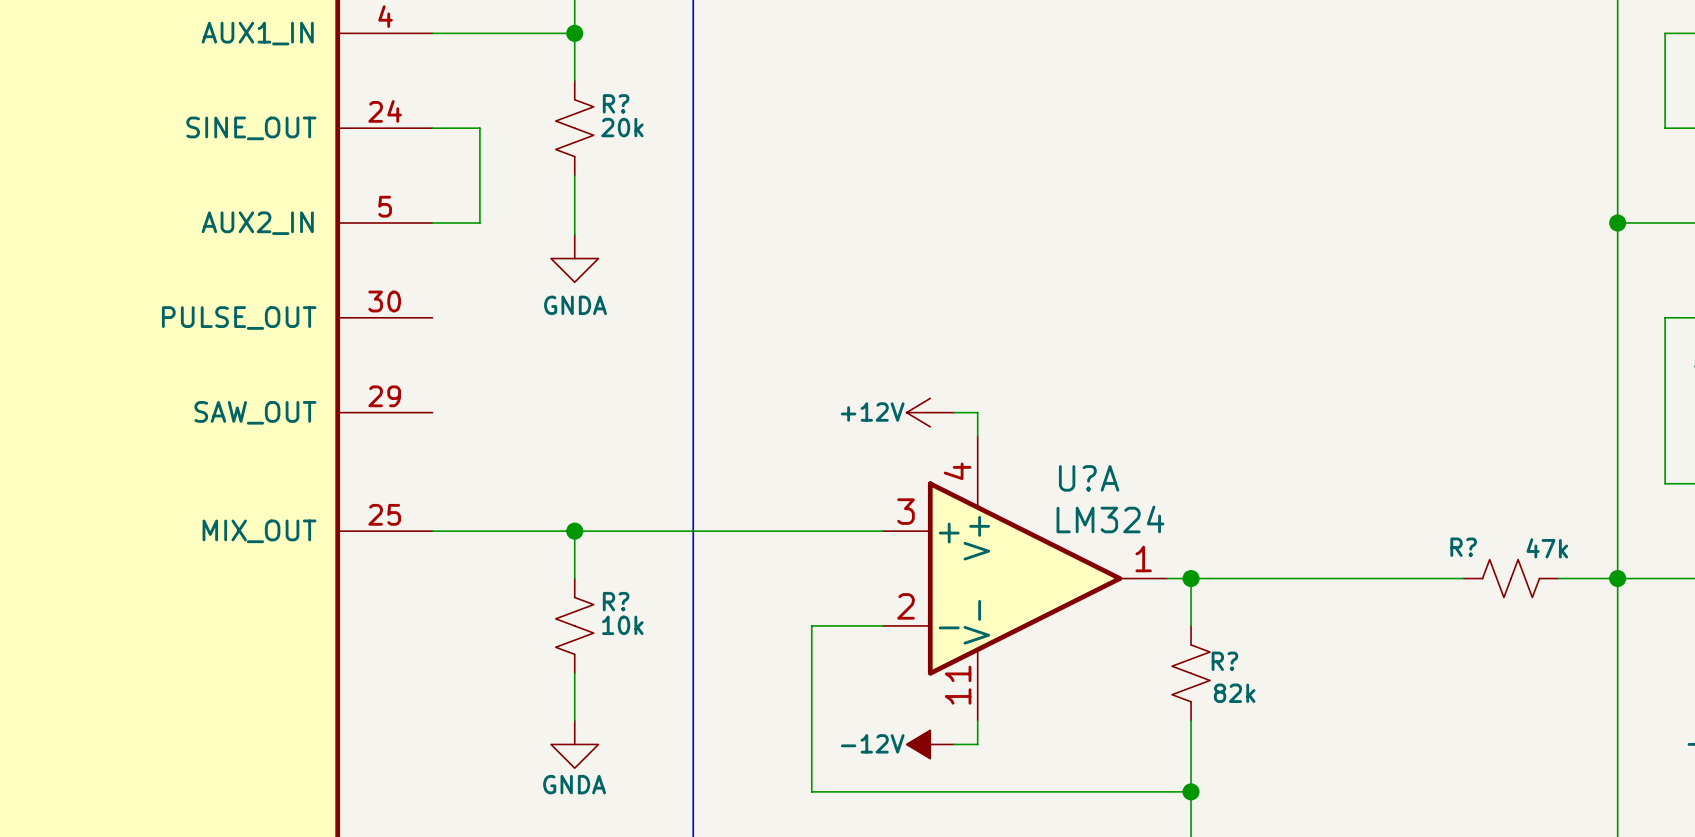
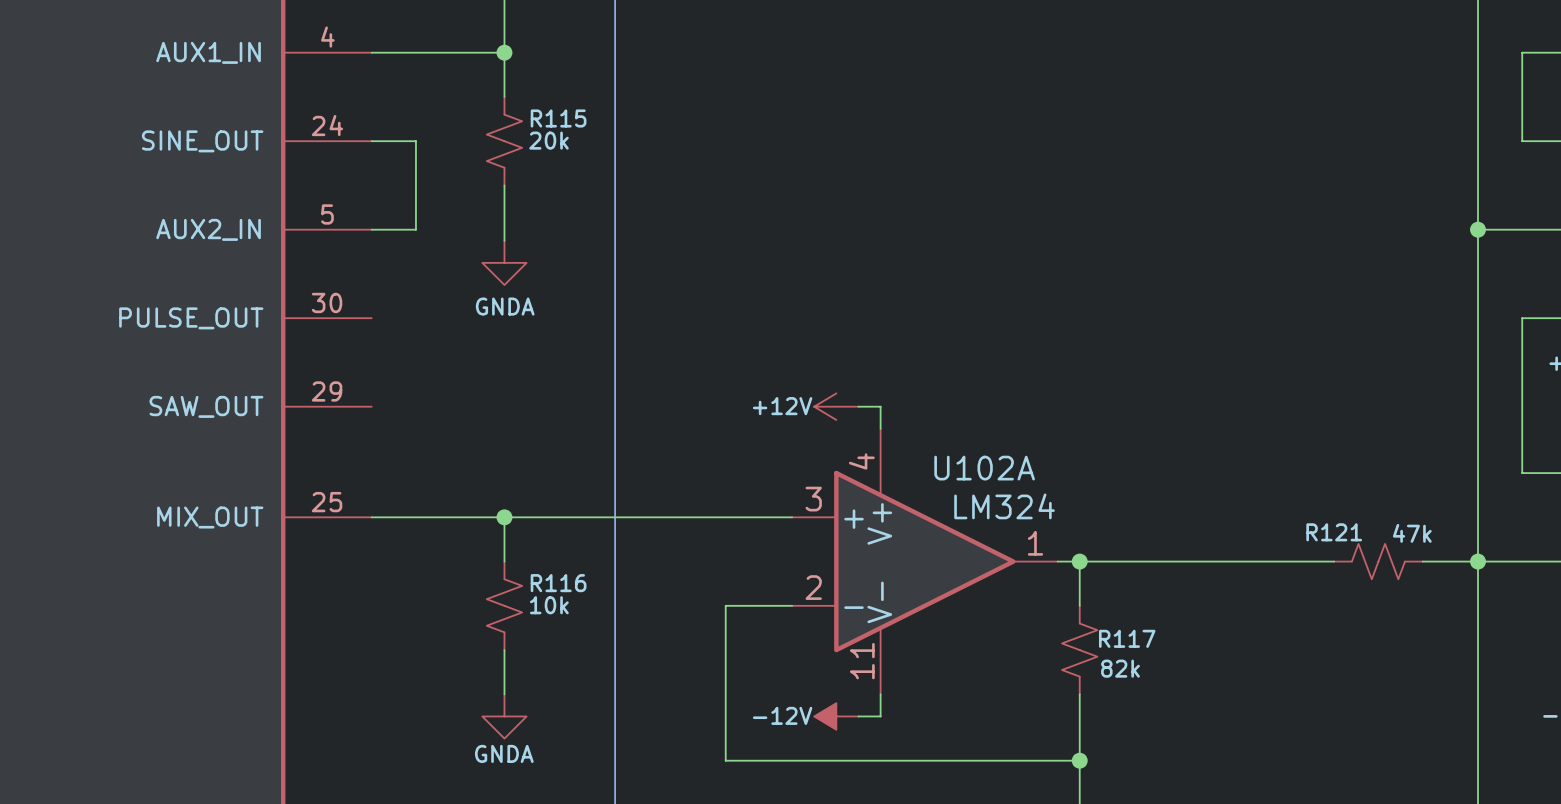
R? name: R? (616, 103) -> R115 (558, 118)
U?A name: U?A (1089, 478) -> U102A (984, 468)
R? name: R? (1463, 547) -> R121 (1334, 532)
R? name: R? (616, 601) -> R116 (558, 583)
R? name: R? (1224, 661) -> R117 (1127, 638)

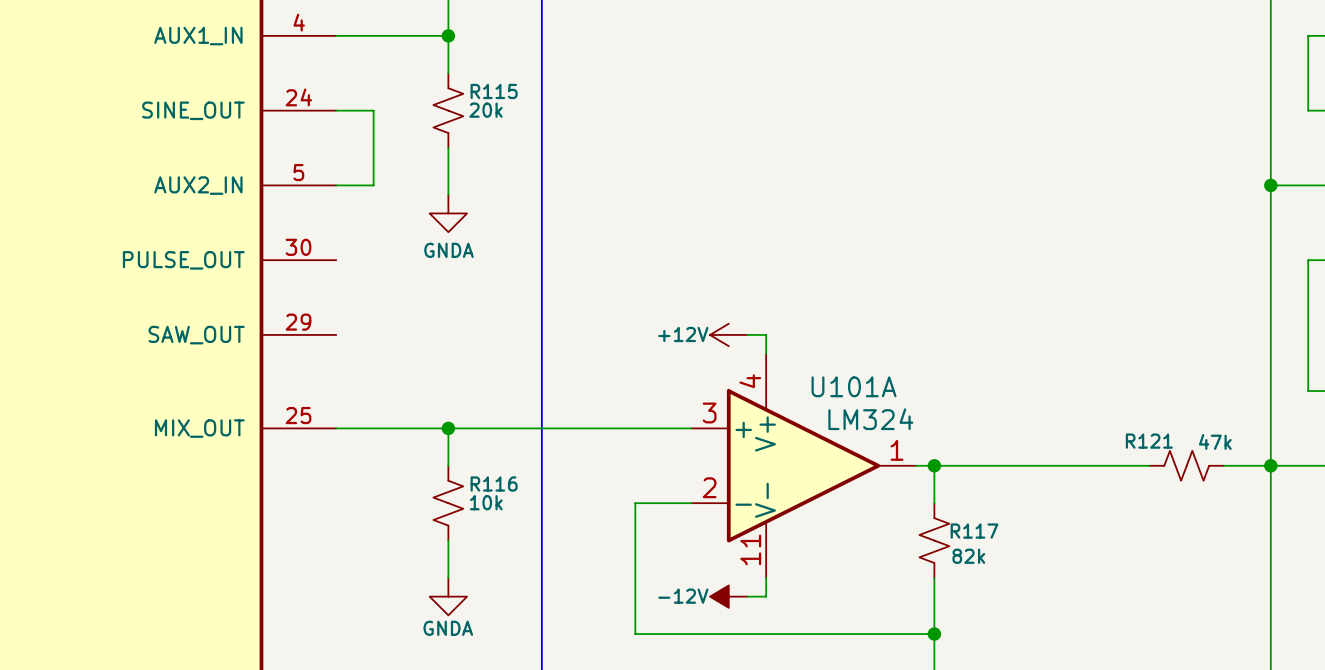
U102A name: U102A (984, 468) -> U101A (854, 386)

